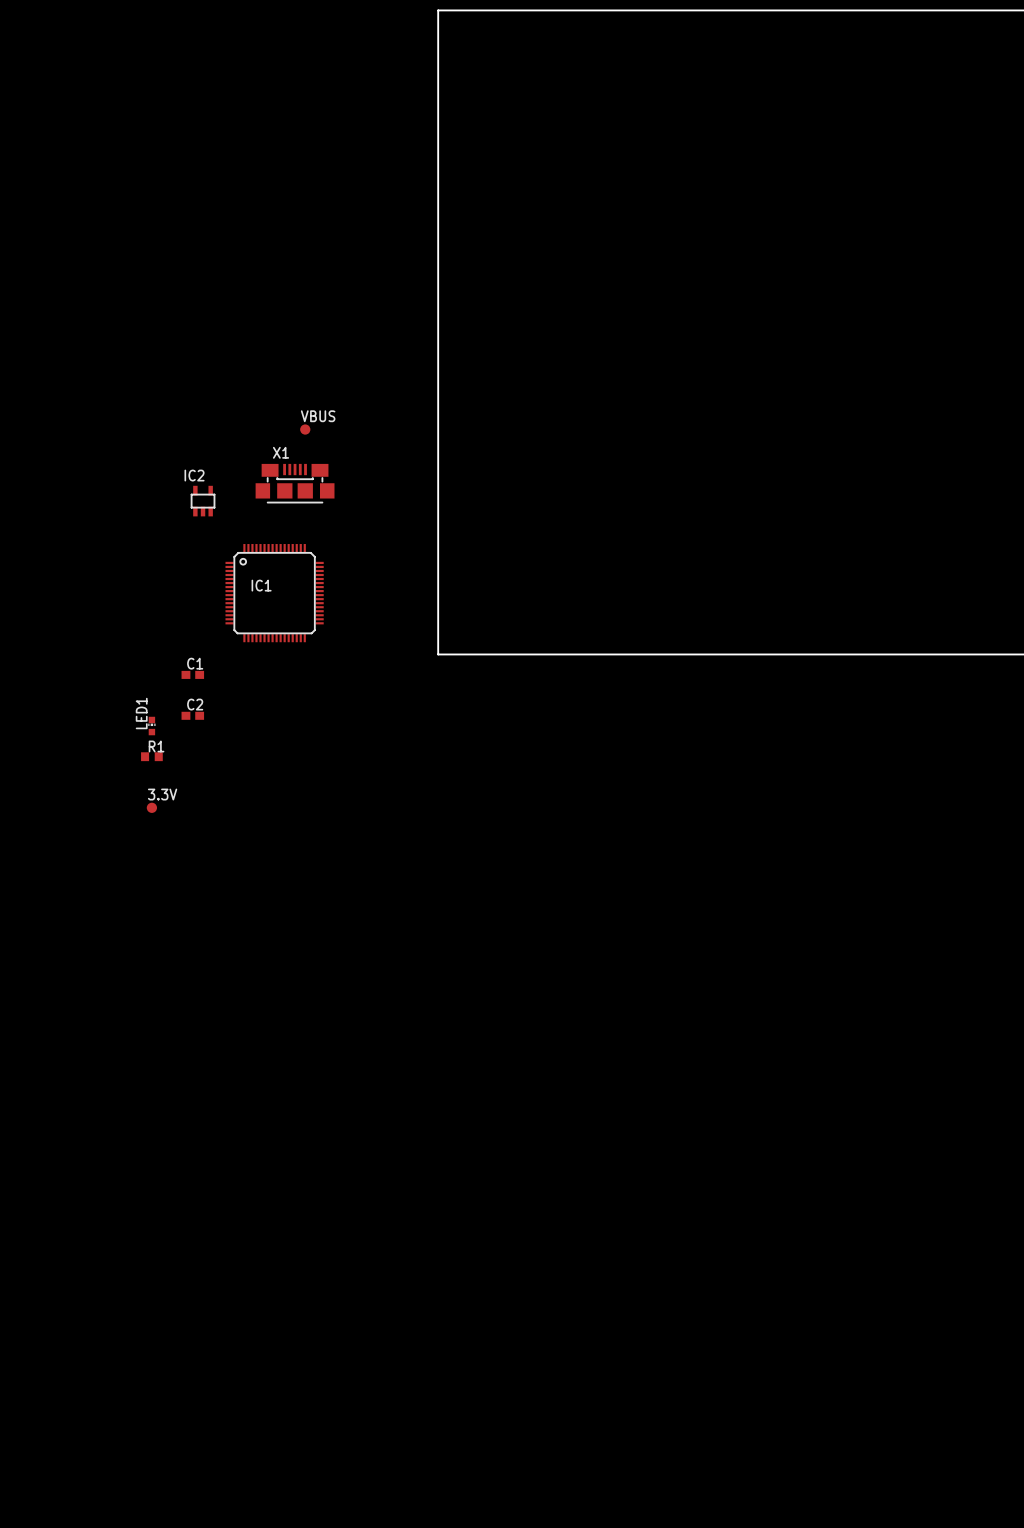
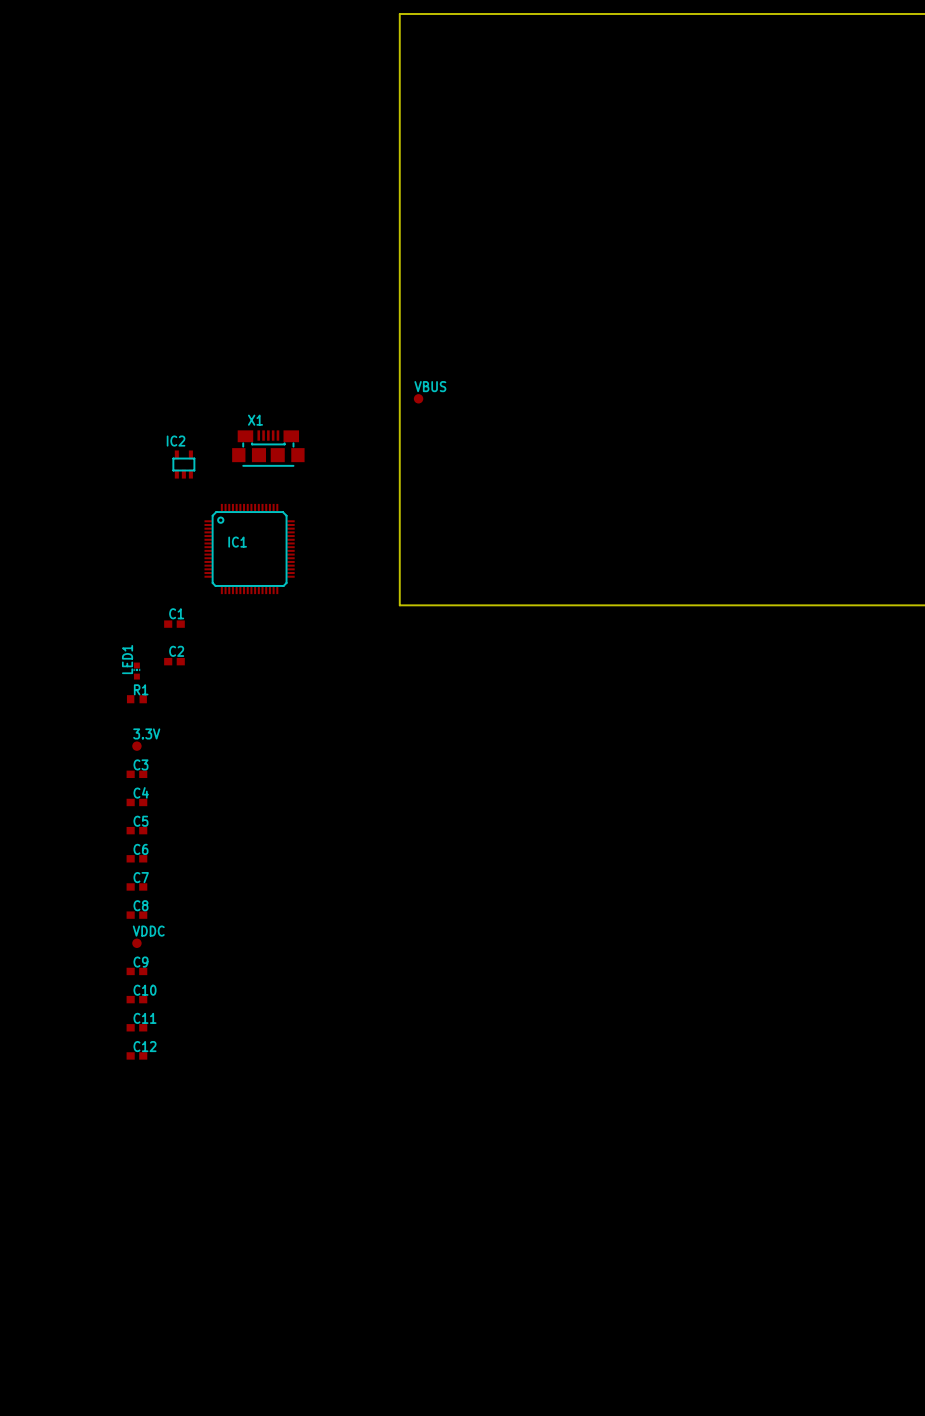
VBUS position: (305, 429) -> (418, 398)
C3: none -> (136, 774)
C4: none -> (136, 802)
C5: none -> (136, 830)
C6: none -> (136, 858)
C7: none -> (136, 886)
C8: none -> (136, 915)
VDDC: none -> (136, 943)
C9: none -> (136, 971)
C10: none -> (136, 999)
C11: none -> (136, 1027)
C12: none -> (136, 1055)

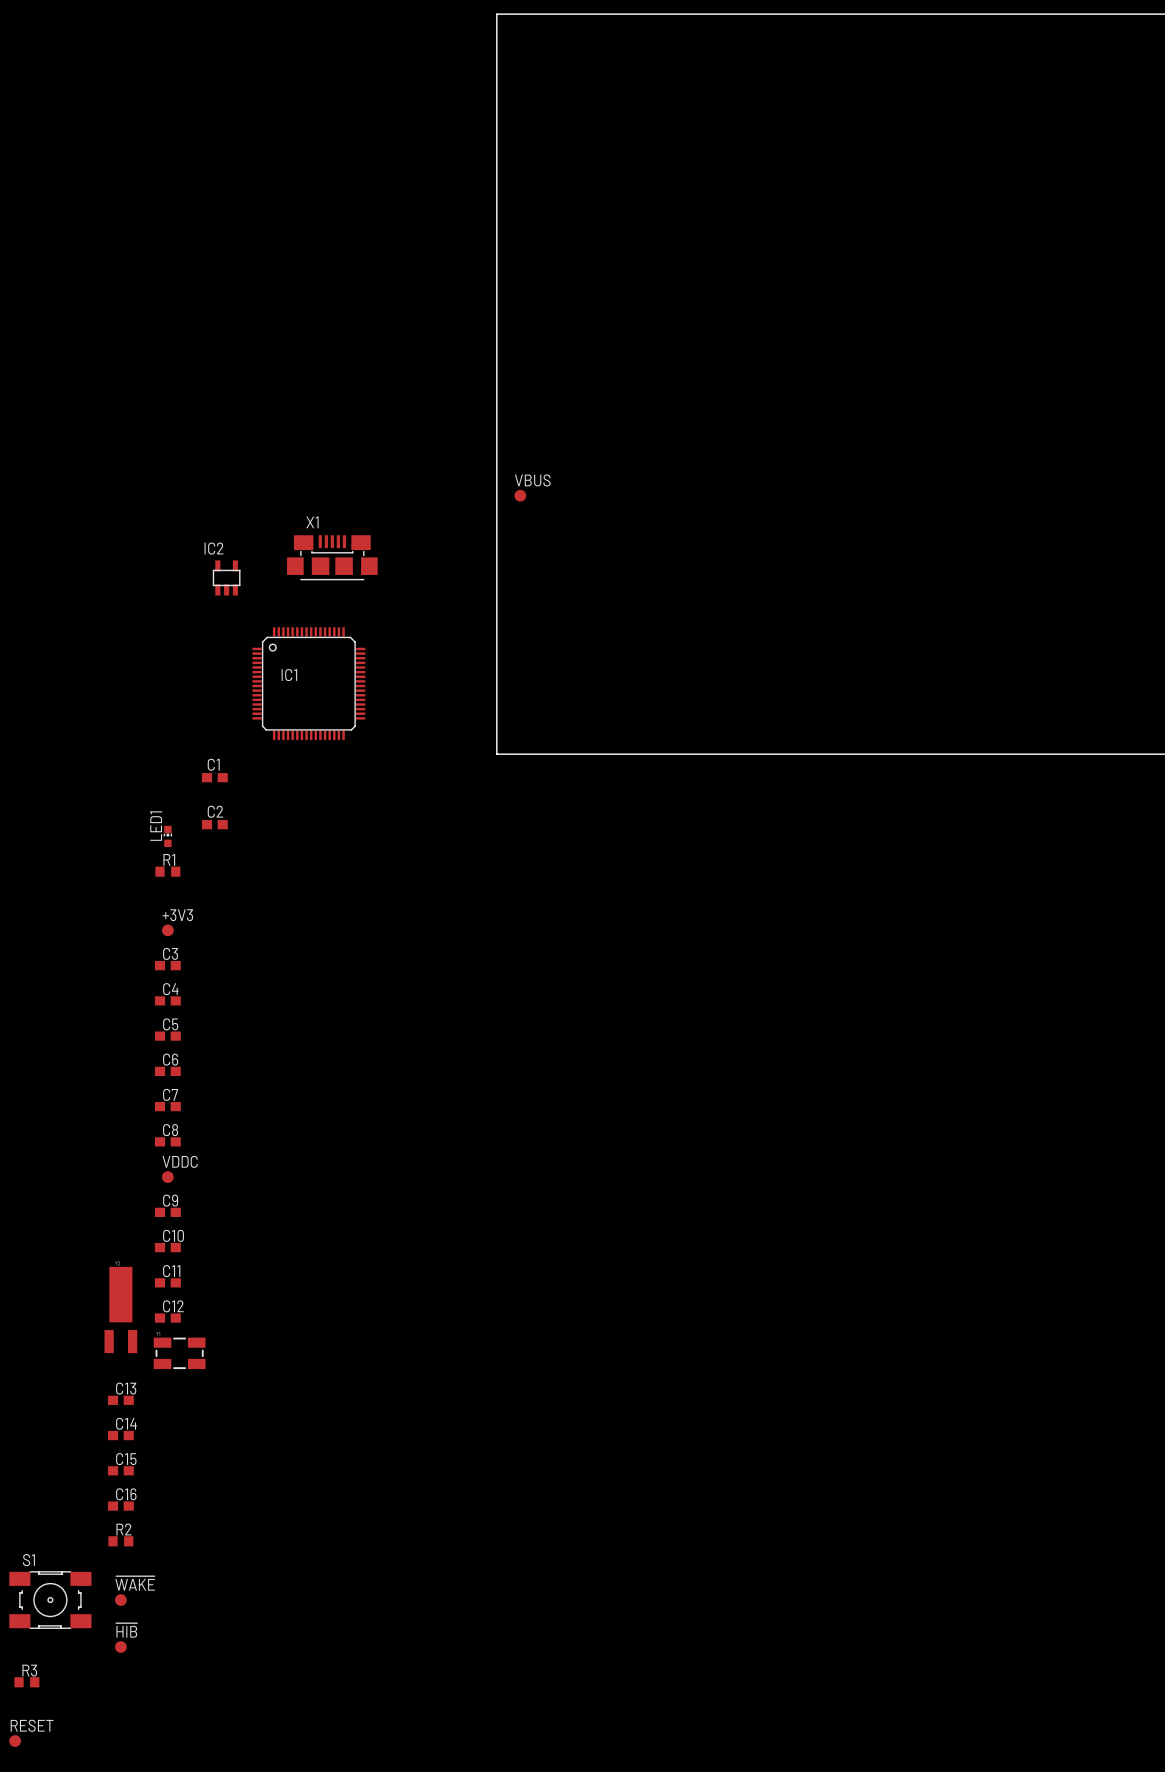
3.3V name: 3.3V (146, 733) -> +3V3 (177, 915)
part: none -> (120, 1309)
part: none -> (179, 1353)
C13: none -> (120, 1400)
C14: none -> (120, 1435)
C15: none -> (120, 1470)
C16: none -> (120, 1506)
R2: none -> (120, 1541)
S1: none -> (50, 1600)
~{WAKE}: none -> (120, 1600)
~{HIB}: none -> (120, 1647)
R3: none -> (26, 1682)
RESET: none -> (15, 1741)

